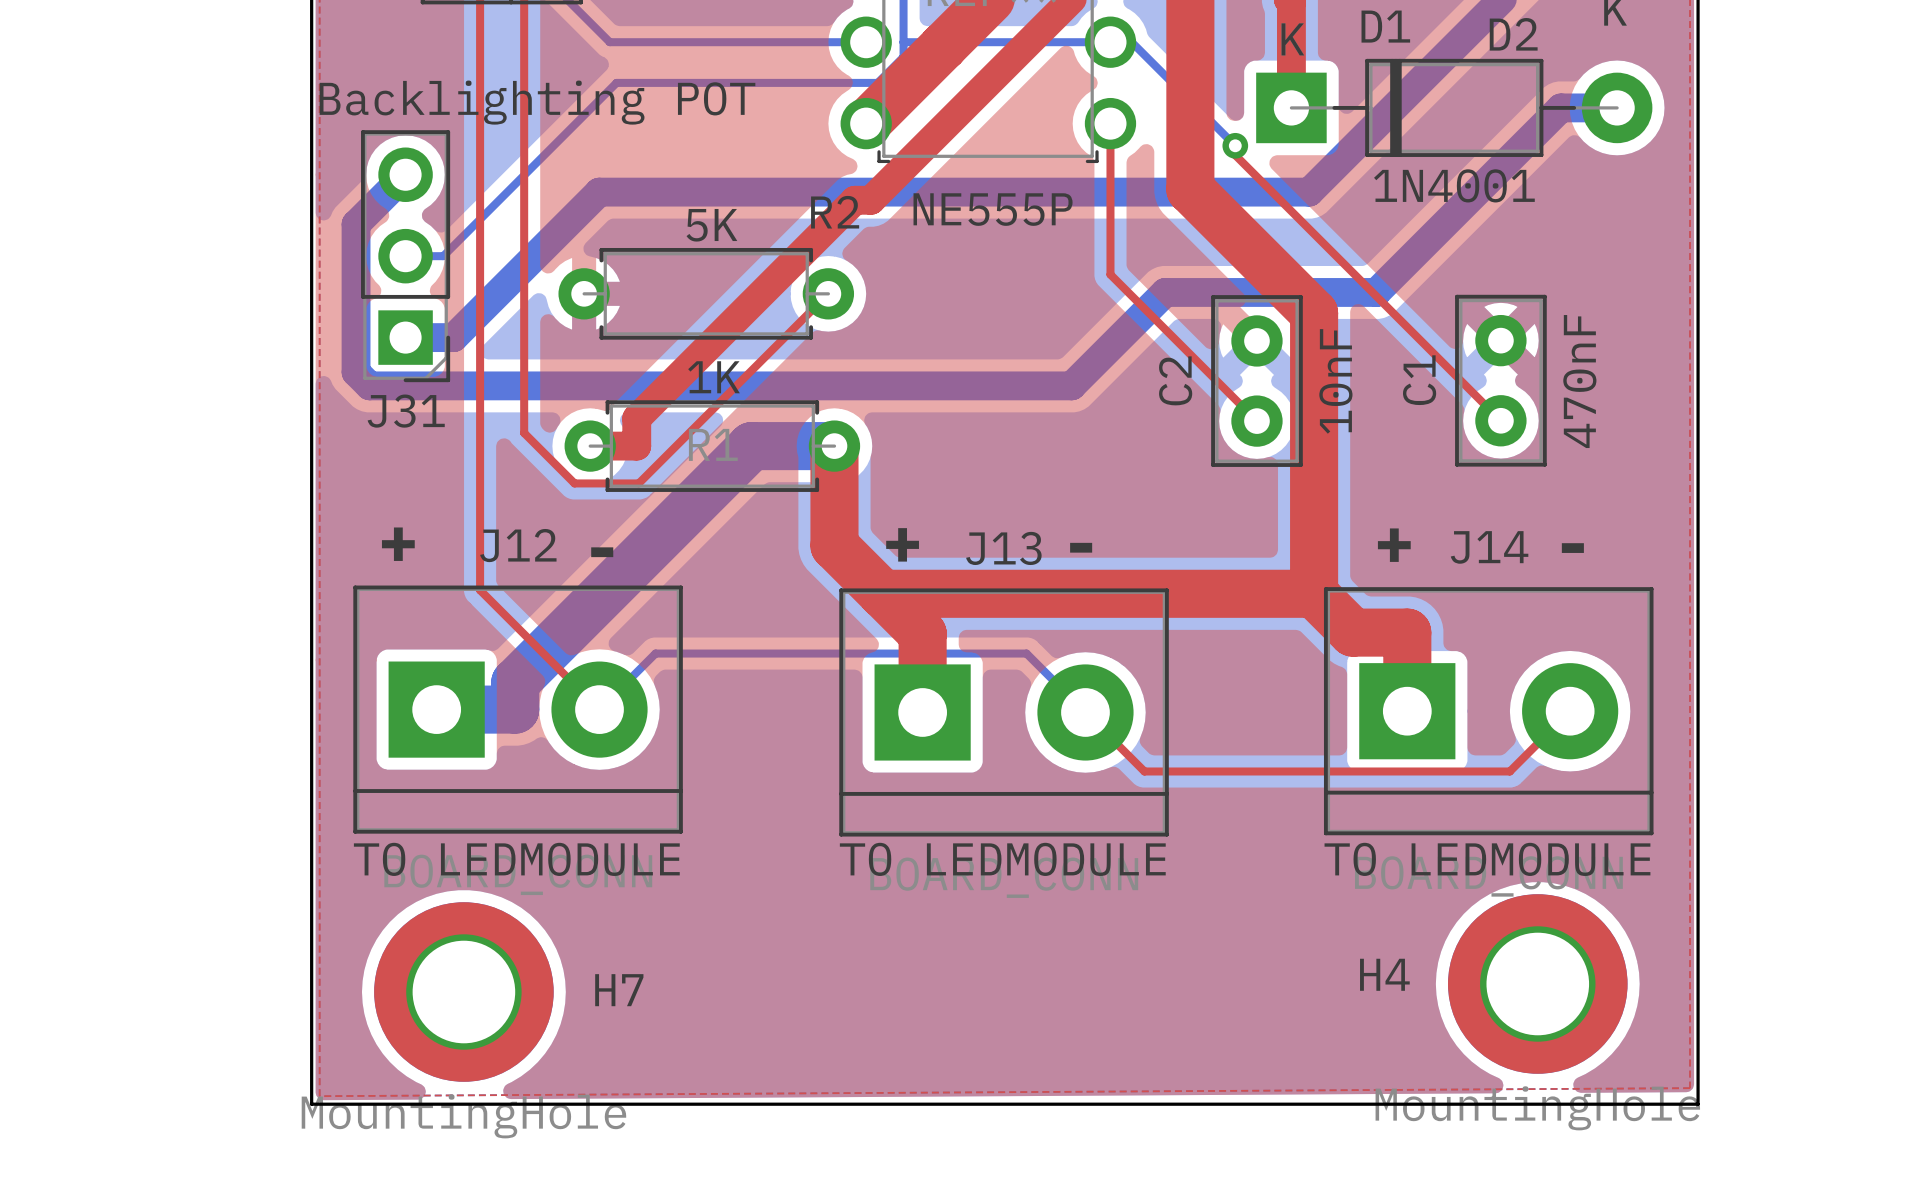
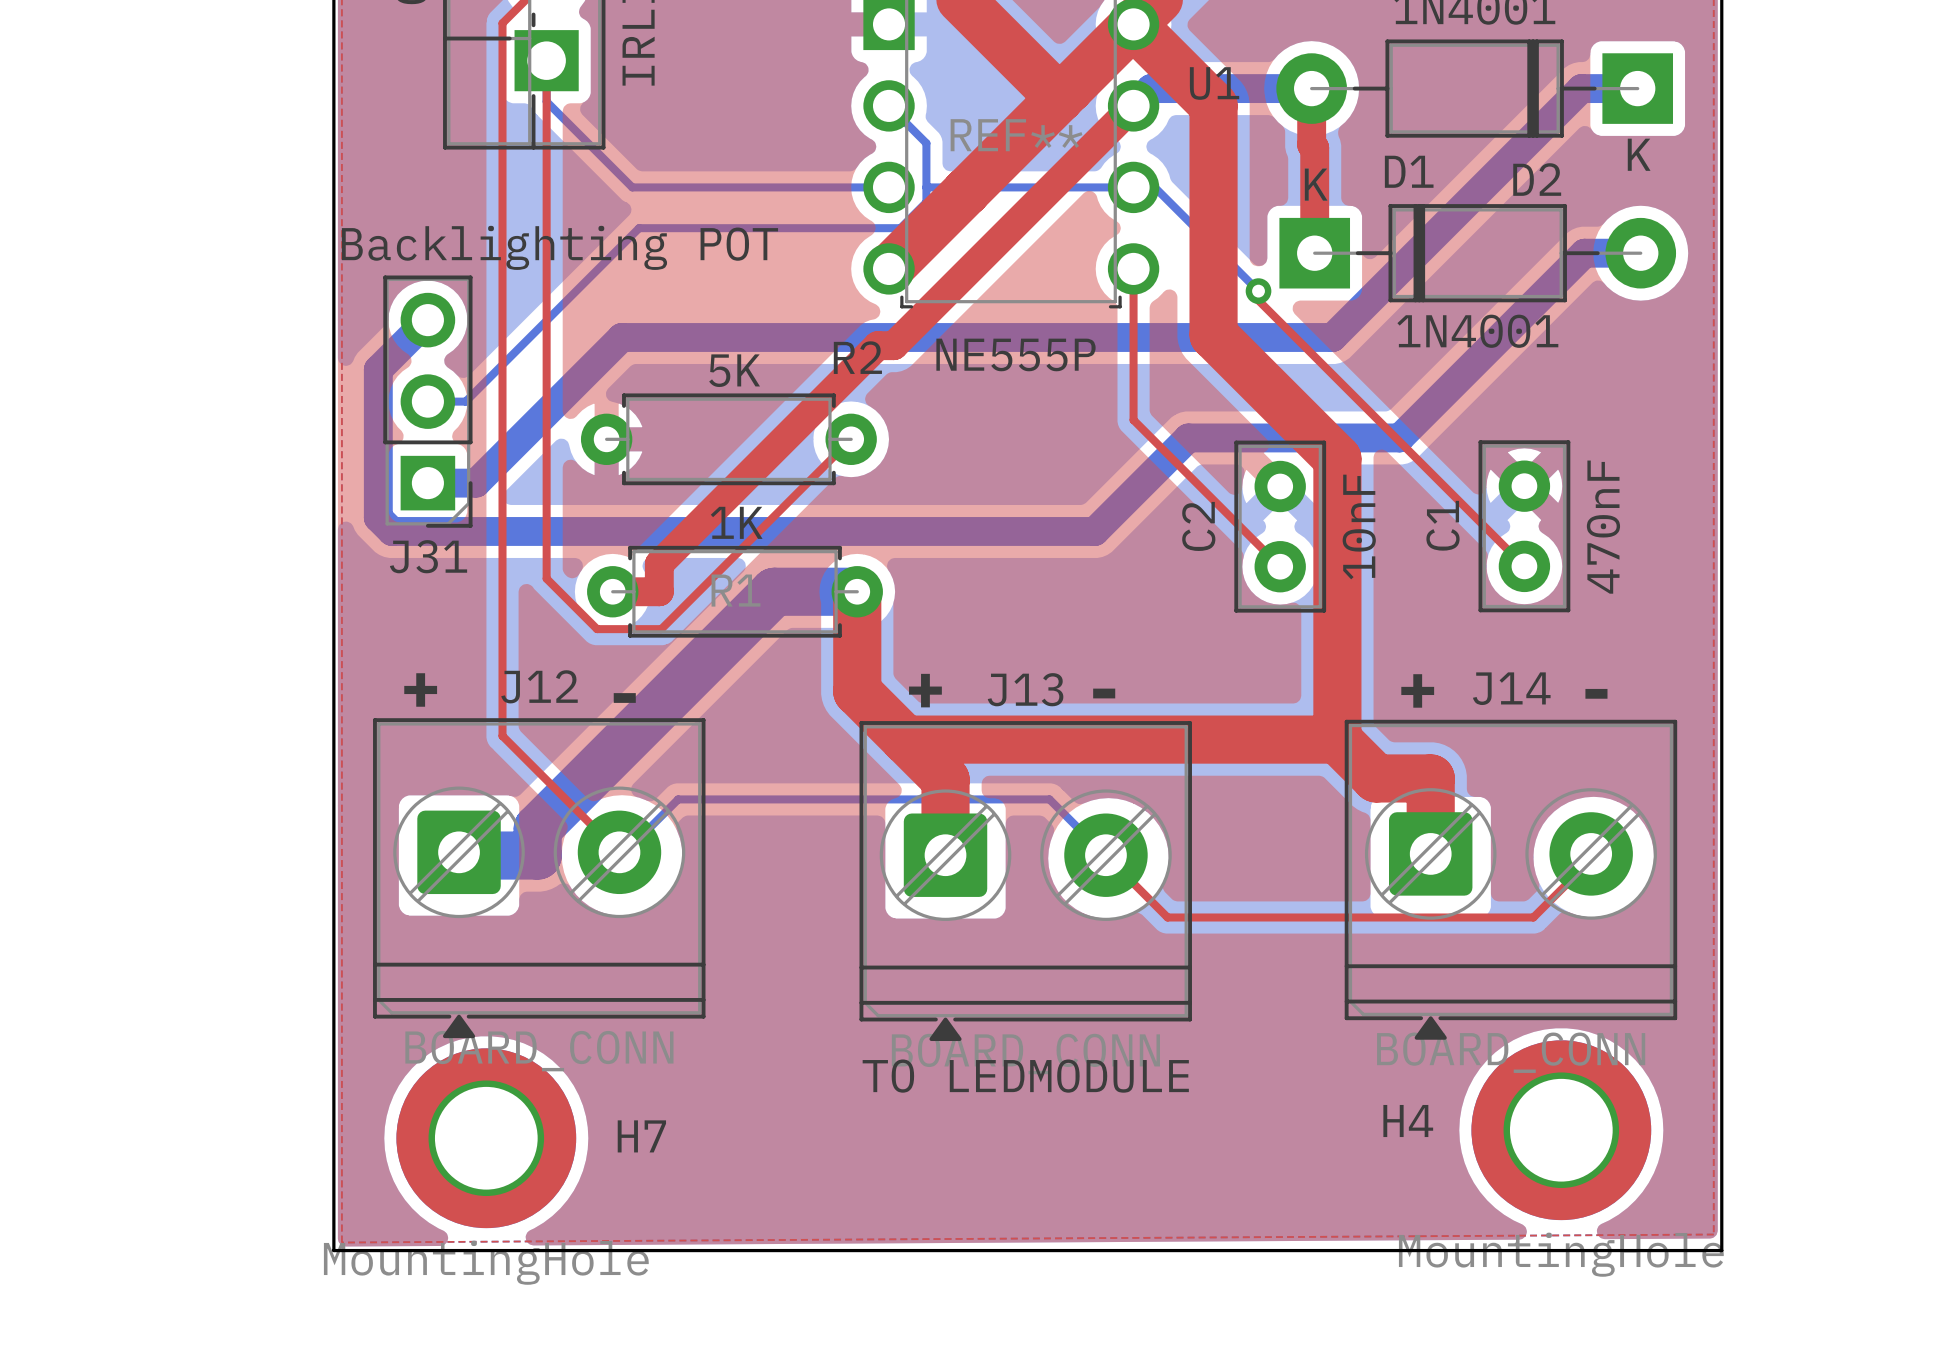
J12 footprint: [353, 585, 683, 834] -> [373, 718, 706, 1039]
J14 footprint: [1323, 587, 1654, 836] -> [1344, 719, 1678, 1040]
J13 footprint: [839, 588, 1169, 837] -> [859, 721, 1192, 1042]
text: TO LEDMODULE (516, 859) -> none
text position: TO LEDMODULE (1002, 859) -> TO LEDMODULE (1025, 1076)
text: TO LEDMODULE (1487, 859) -> none

